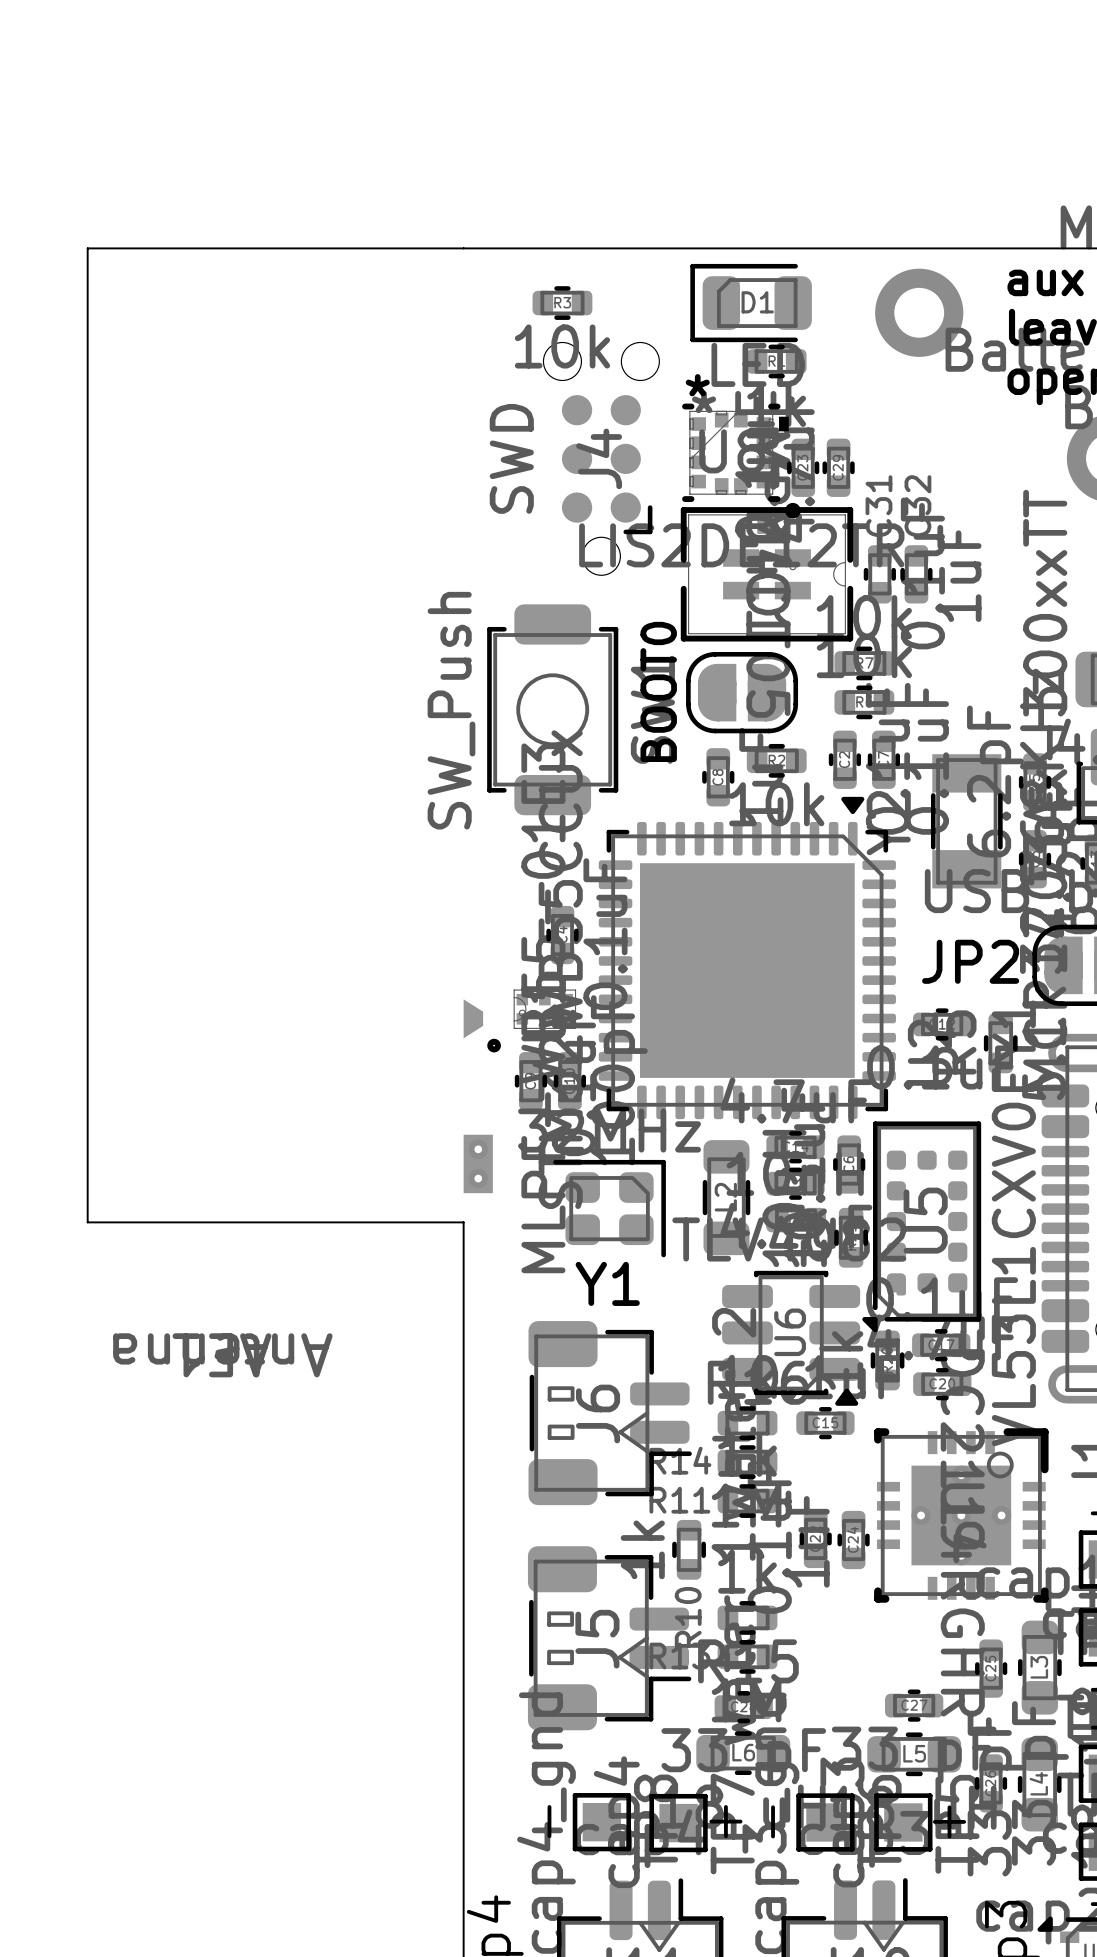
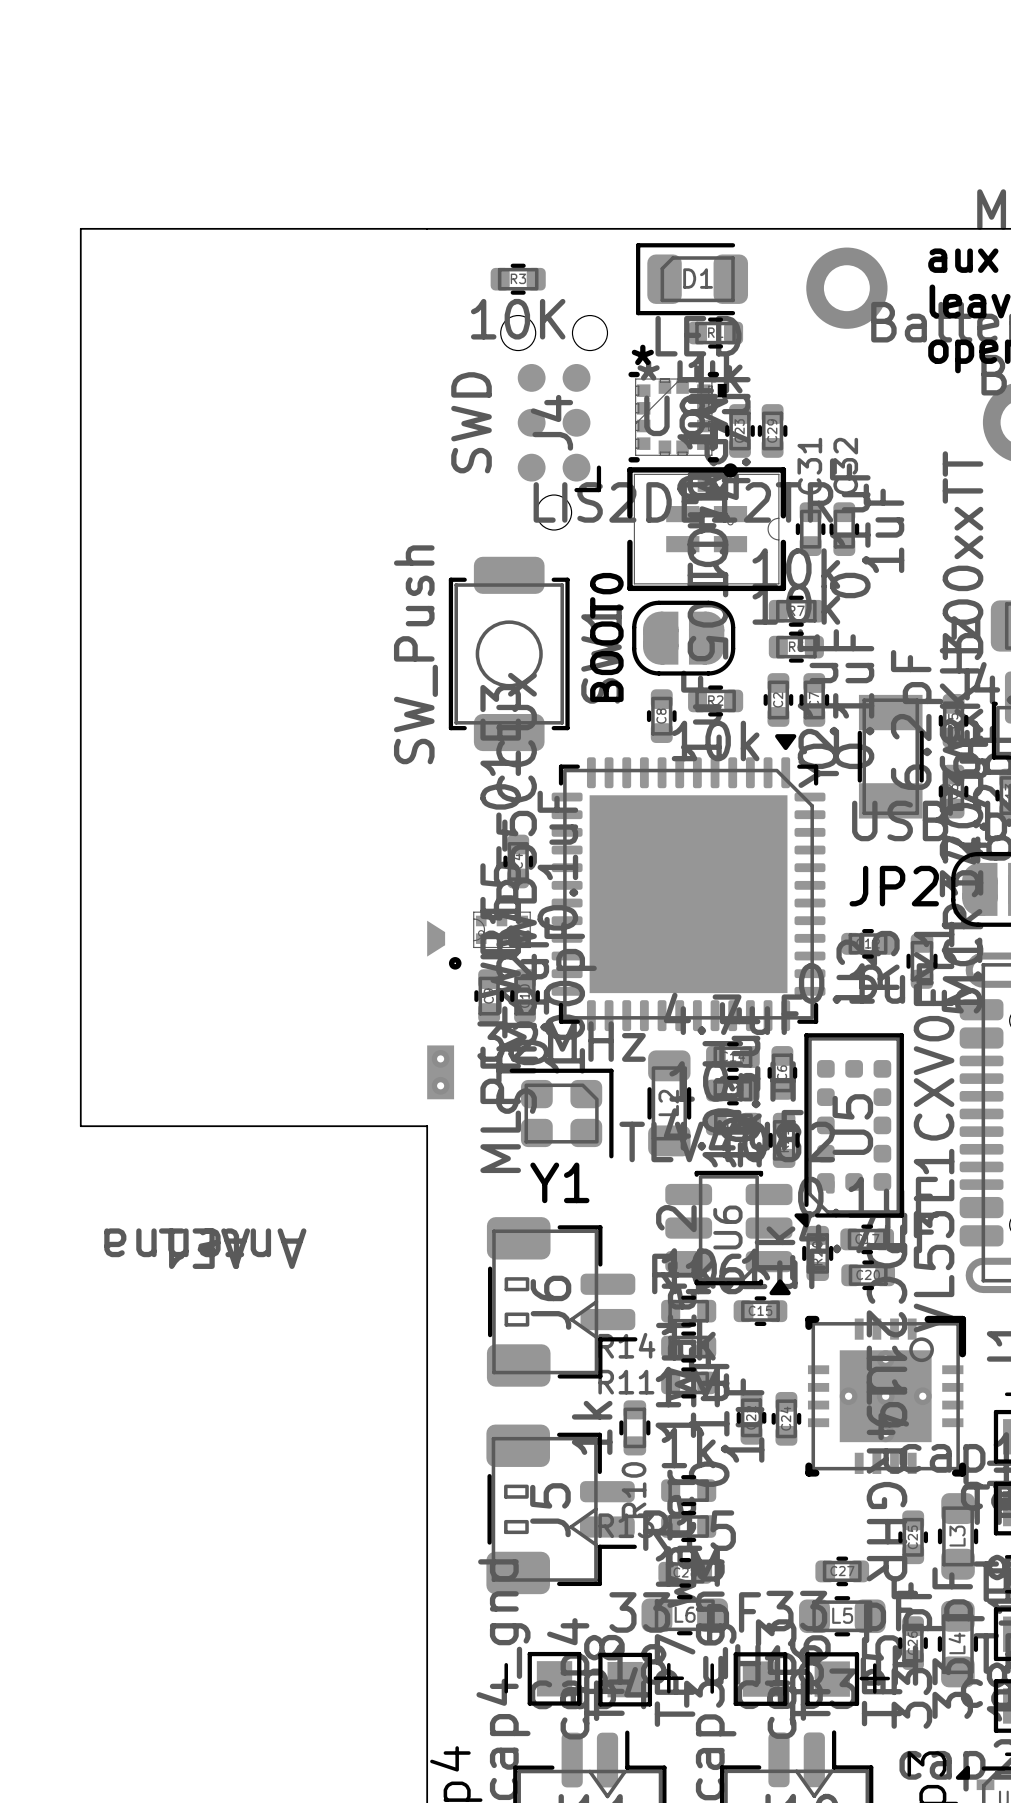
R3 value: 10k (562, 346) -> 10K (518, 319)

